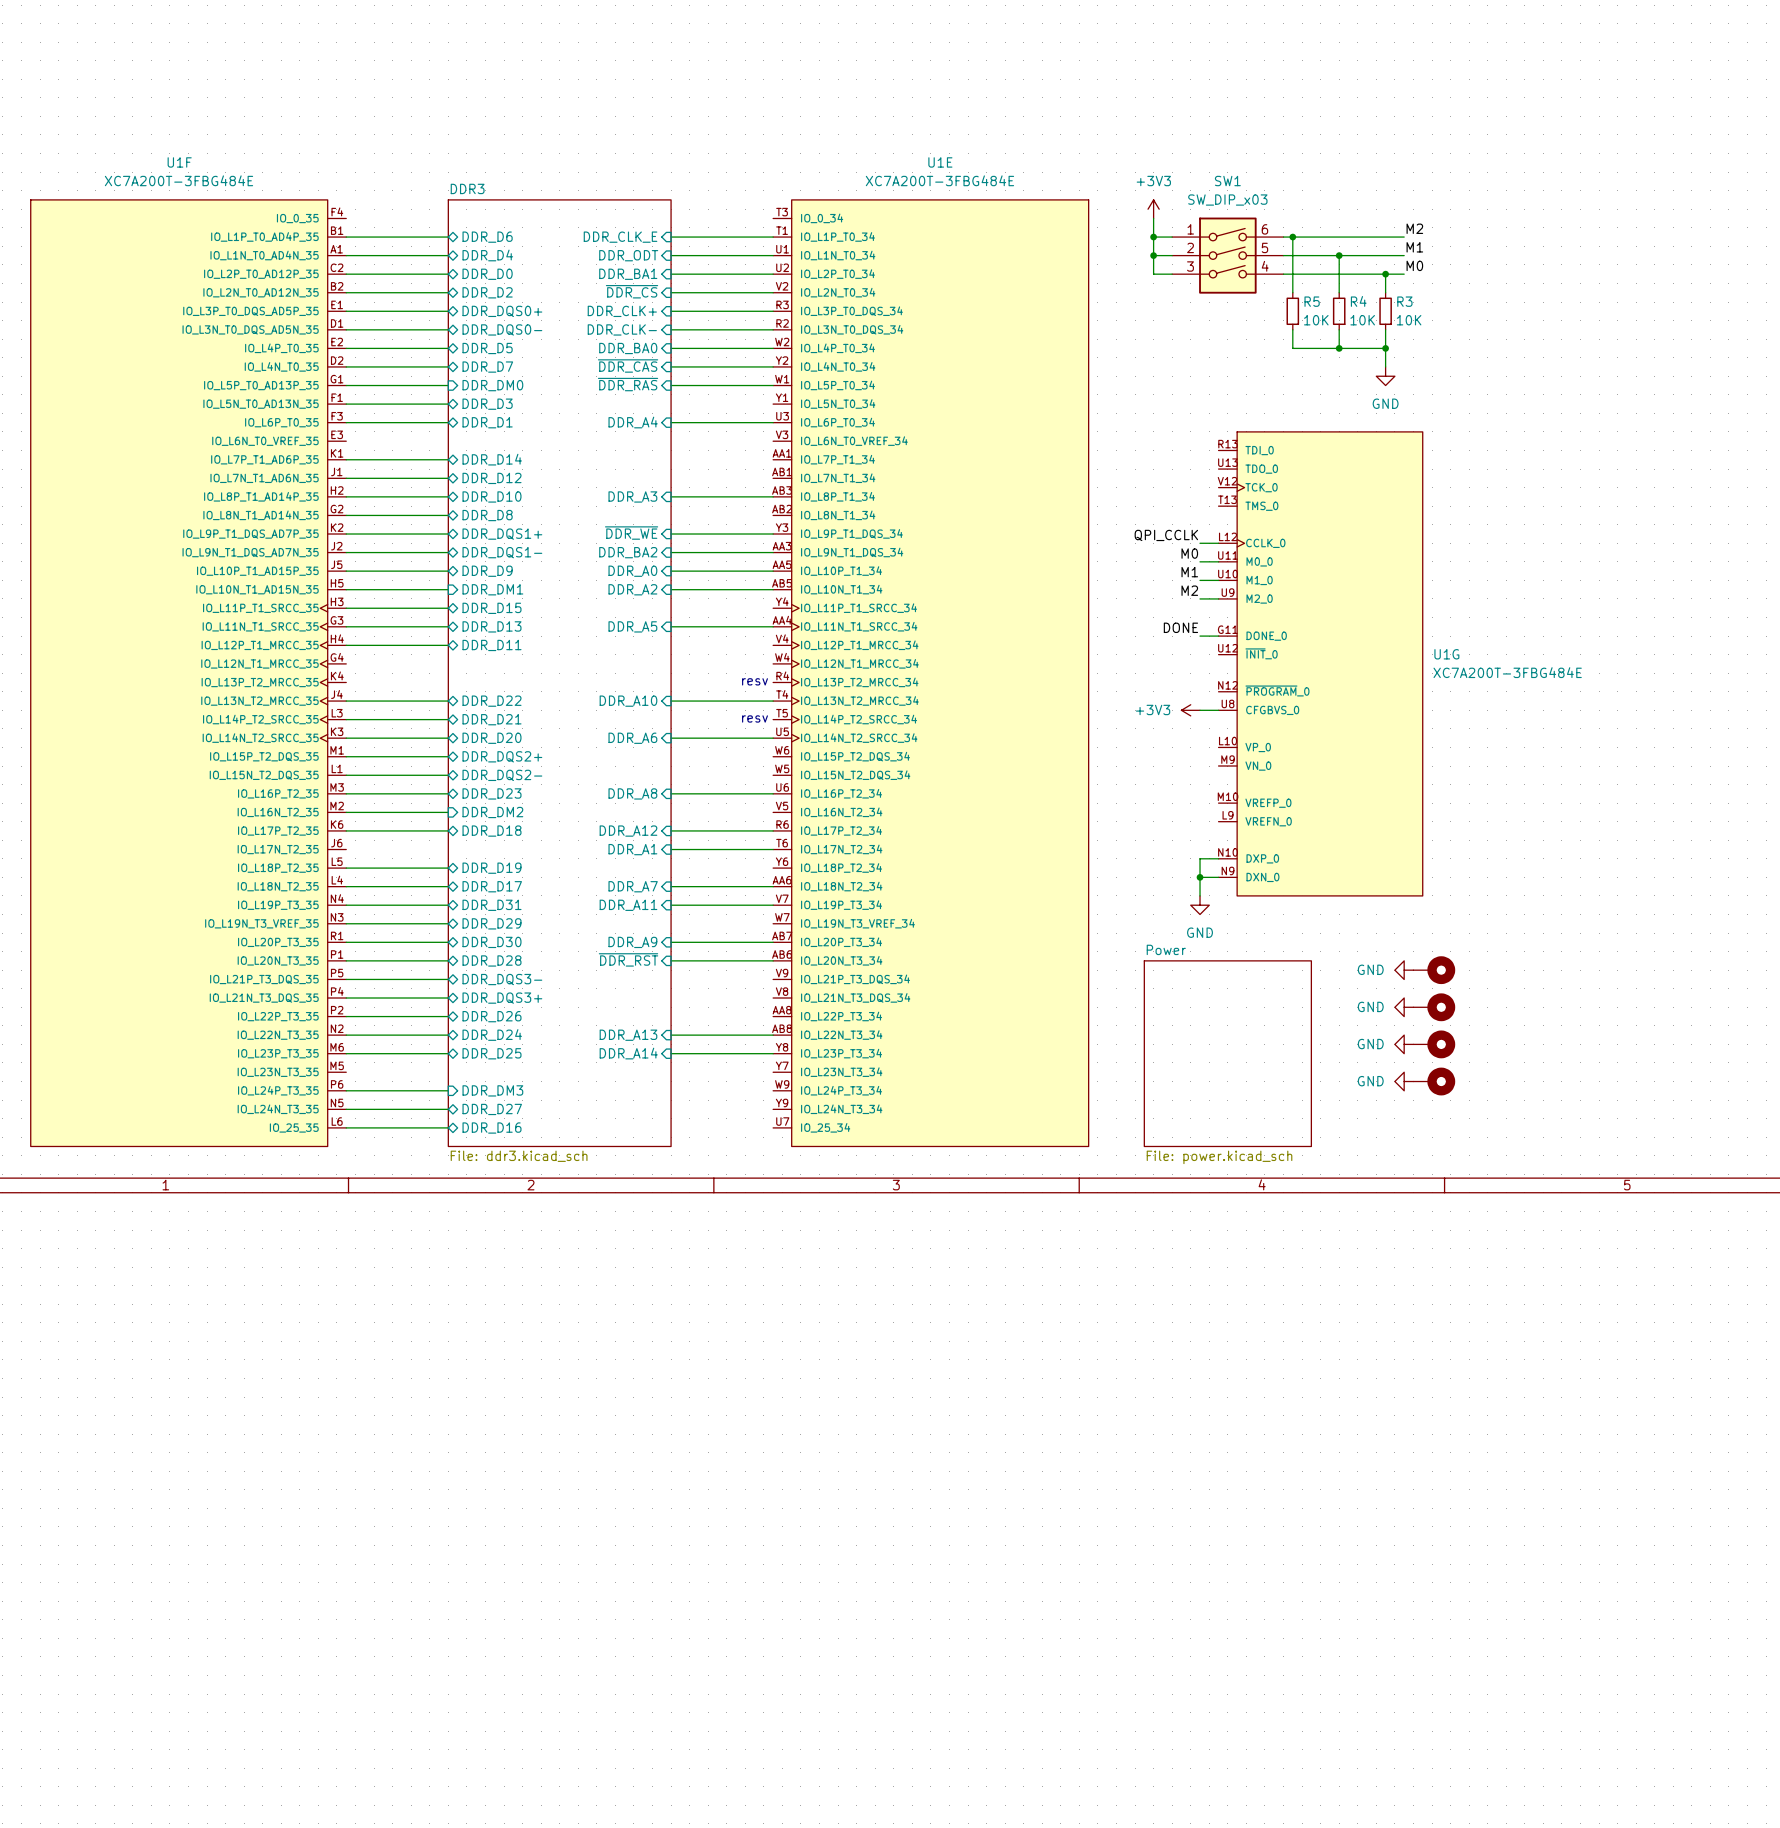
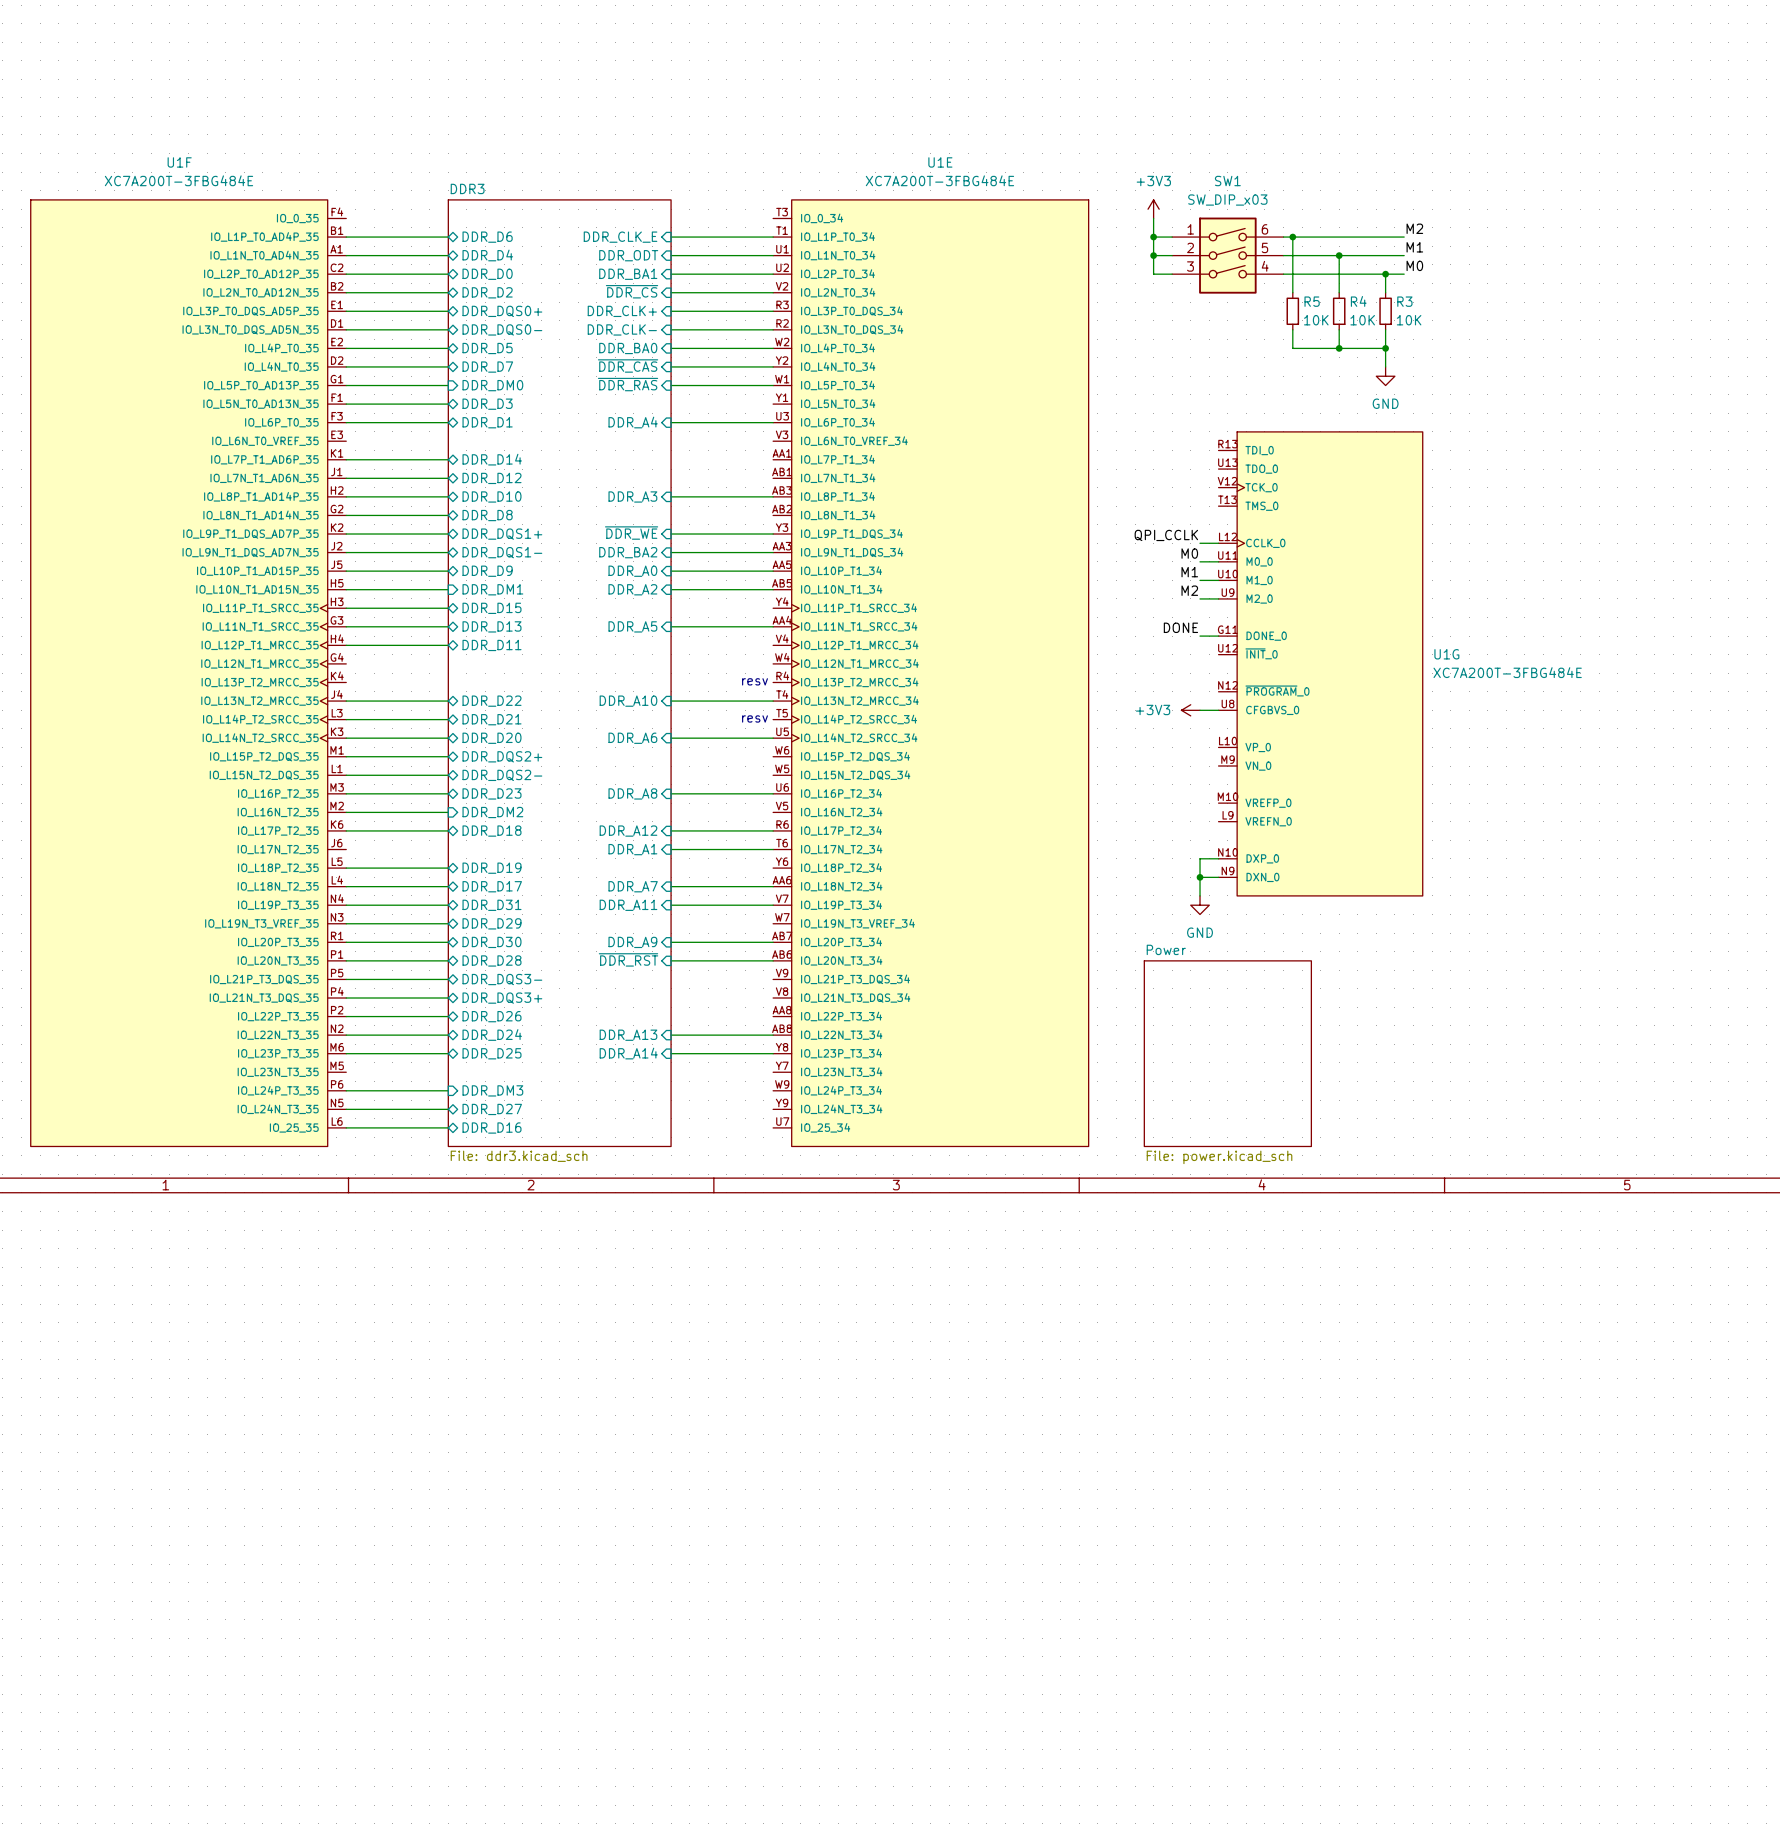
power symbol: GND (1404, 970) -> none
part: (1434, 970) -> none
power symbol: GND (1404, 1007) -> none
part: (1434, 1007) -> none
power symbol: GND (1404, 1044) -> none
part: (1434, 1044) -> none
power symbol: GND (1404, 1081) -> none
part: (1434, 1081) -> none

